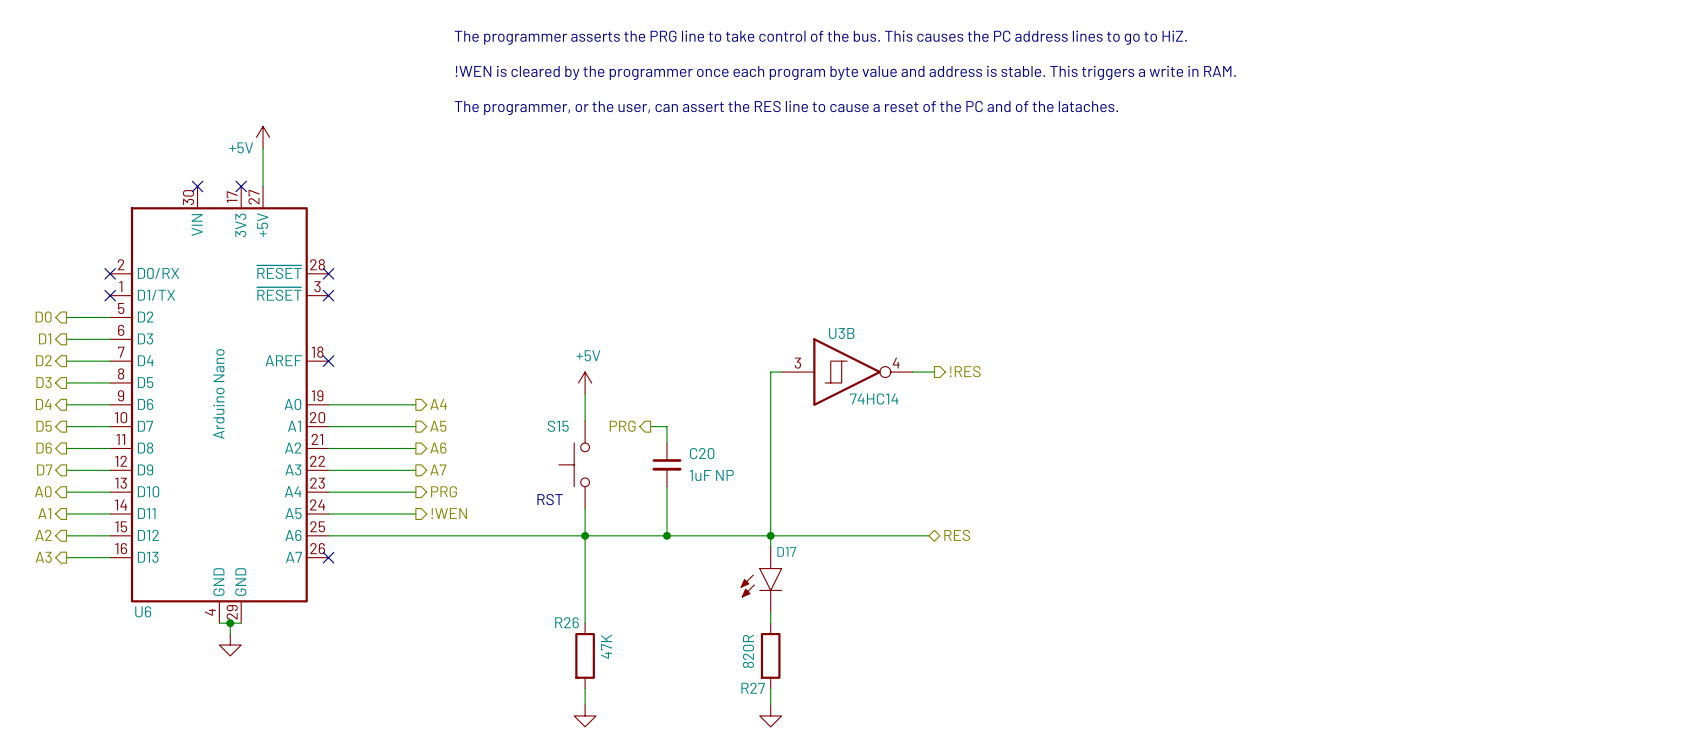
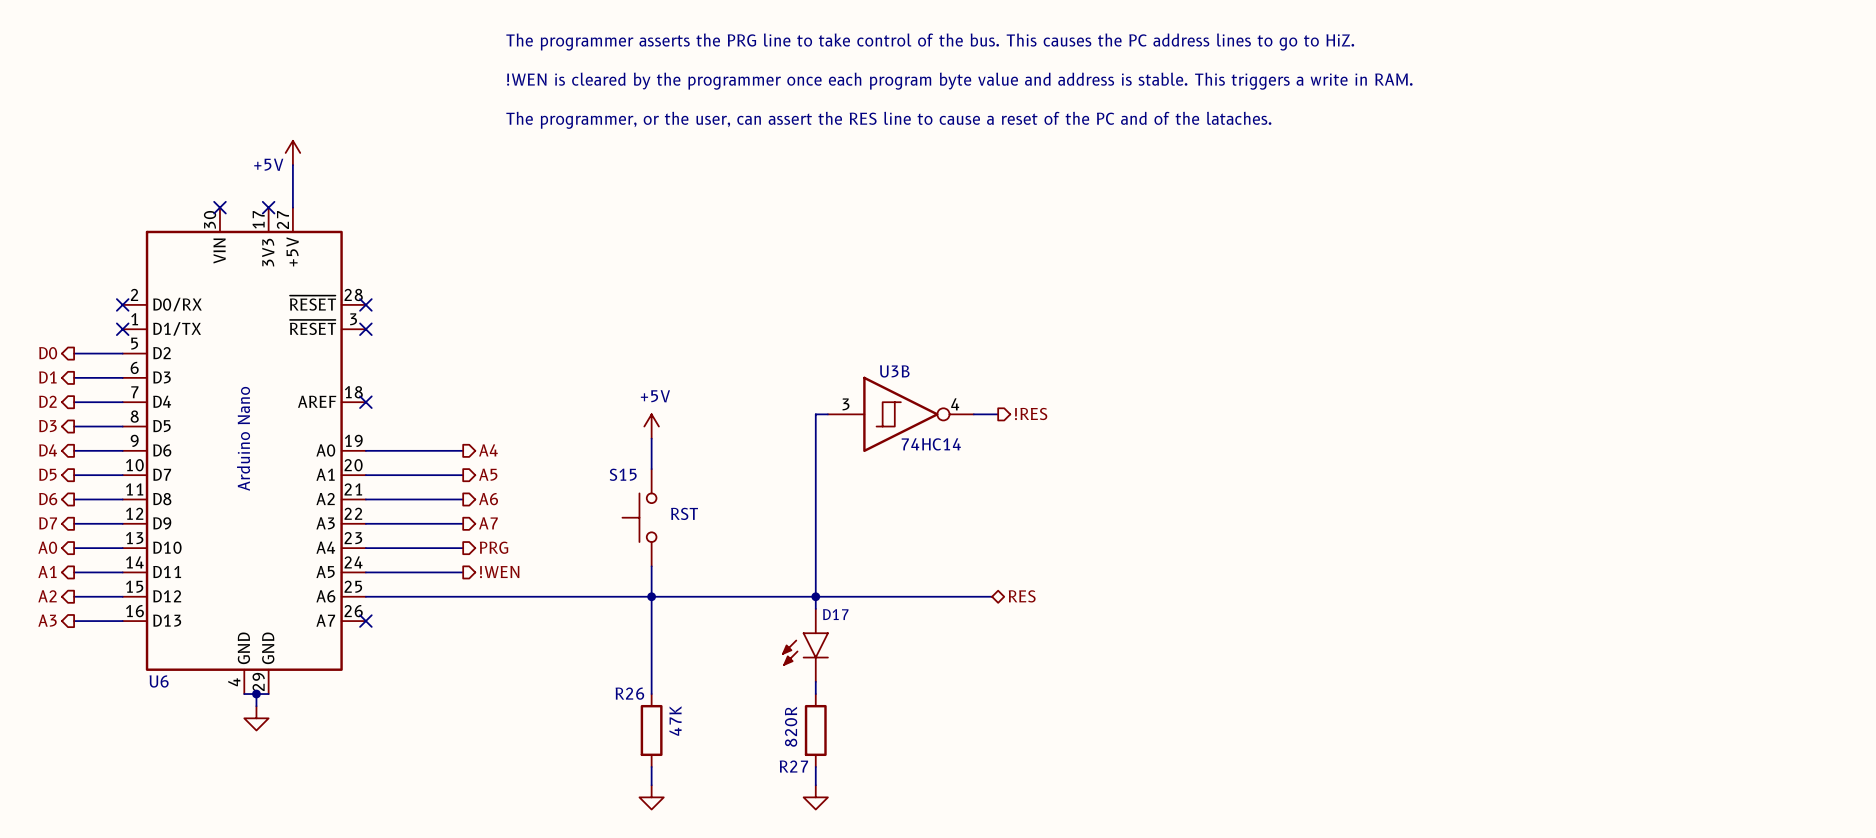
hierarchical label position: !RES (965, 371) -> !RES (1031, 413)
wire: (781, 372) (770, 372) (770, 546) -> (827, 414) (815, 414) (815, 608)
U3B position: (847, 372) -> (900, 414)
wire: (912, 372) (934, 372) -> (973, 414) (998, 414)
hierarchical label: PRG (622, 426) -> none
wire: (650, 426) (666, 426) (666, 443) -> none
C20: 1uF NP (666, 464) -> none
wire: (666, 486) (666, 535) -> none
text position: RST (550, 499) -> RST (684, 513)
junction: (666, 535) -> none
junction: none -> (815, 596)
junction: (770, 535) -> none
wire: (890, 535) (929, 535) -> none
hierarchical label position: RES (957, 535) -> RES (1022, 596)
D17 position: (761, 579) -> (805, 645)
wire: (770, 612) (770, 623) -> (815, 681) (815, 694)
R27 position: (770, 655) -> (815, 730)
wire: (770, 688) (770, 705) -> (815, 766) (815, 785)
power symbol position: (770, 715) -> (815, 797)

